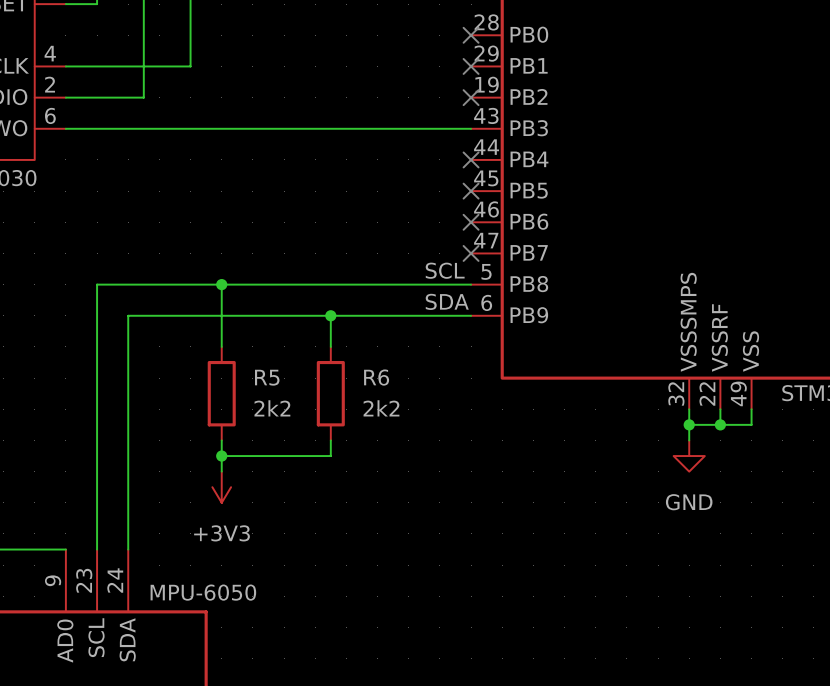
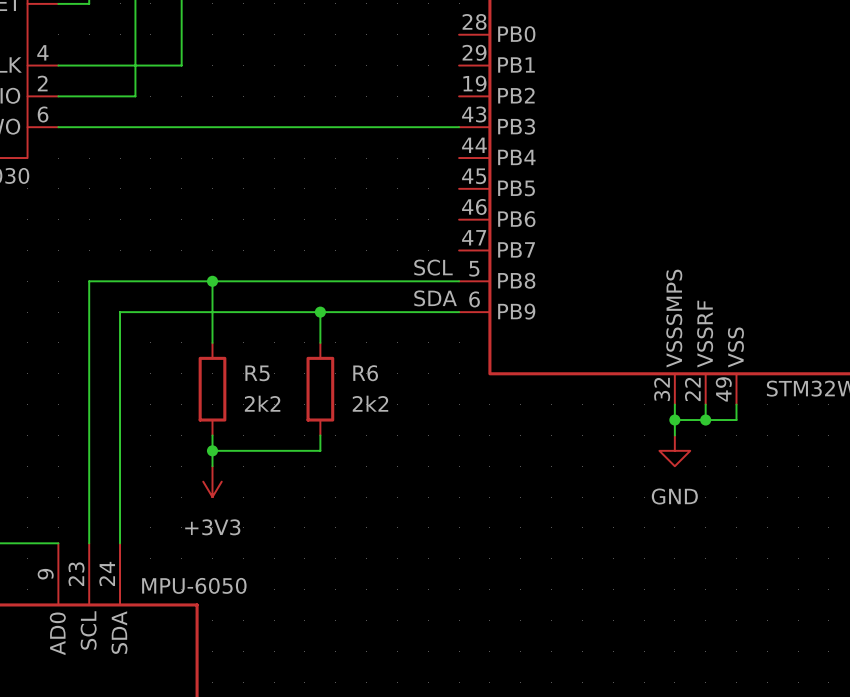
no-connect mark: (471, 35) -> none
no-connect mark: (471, 66) -> none
no-connect mark: (471, 97) -> none
no-connect mark: (471, 159) -> none
no-connect mark: (471, 191) -> none
no-connect mark: (471, 222) -> none
no-connect mark: (471, 253) -> none

